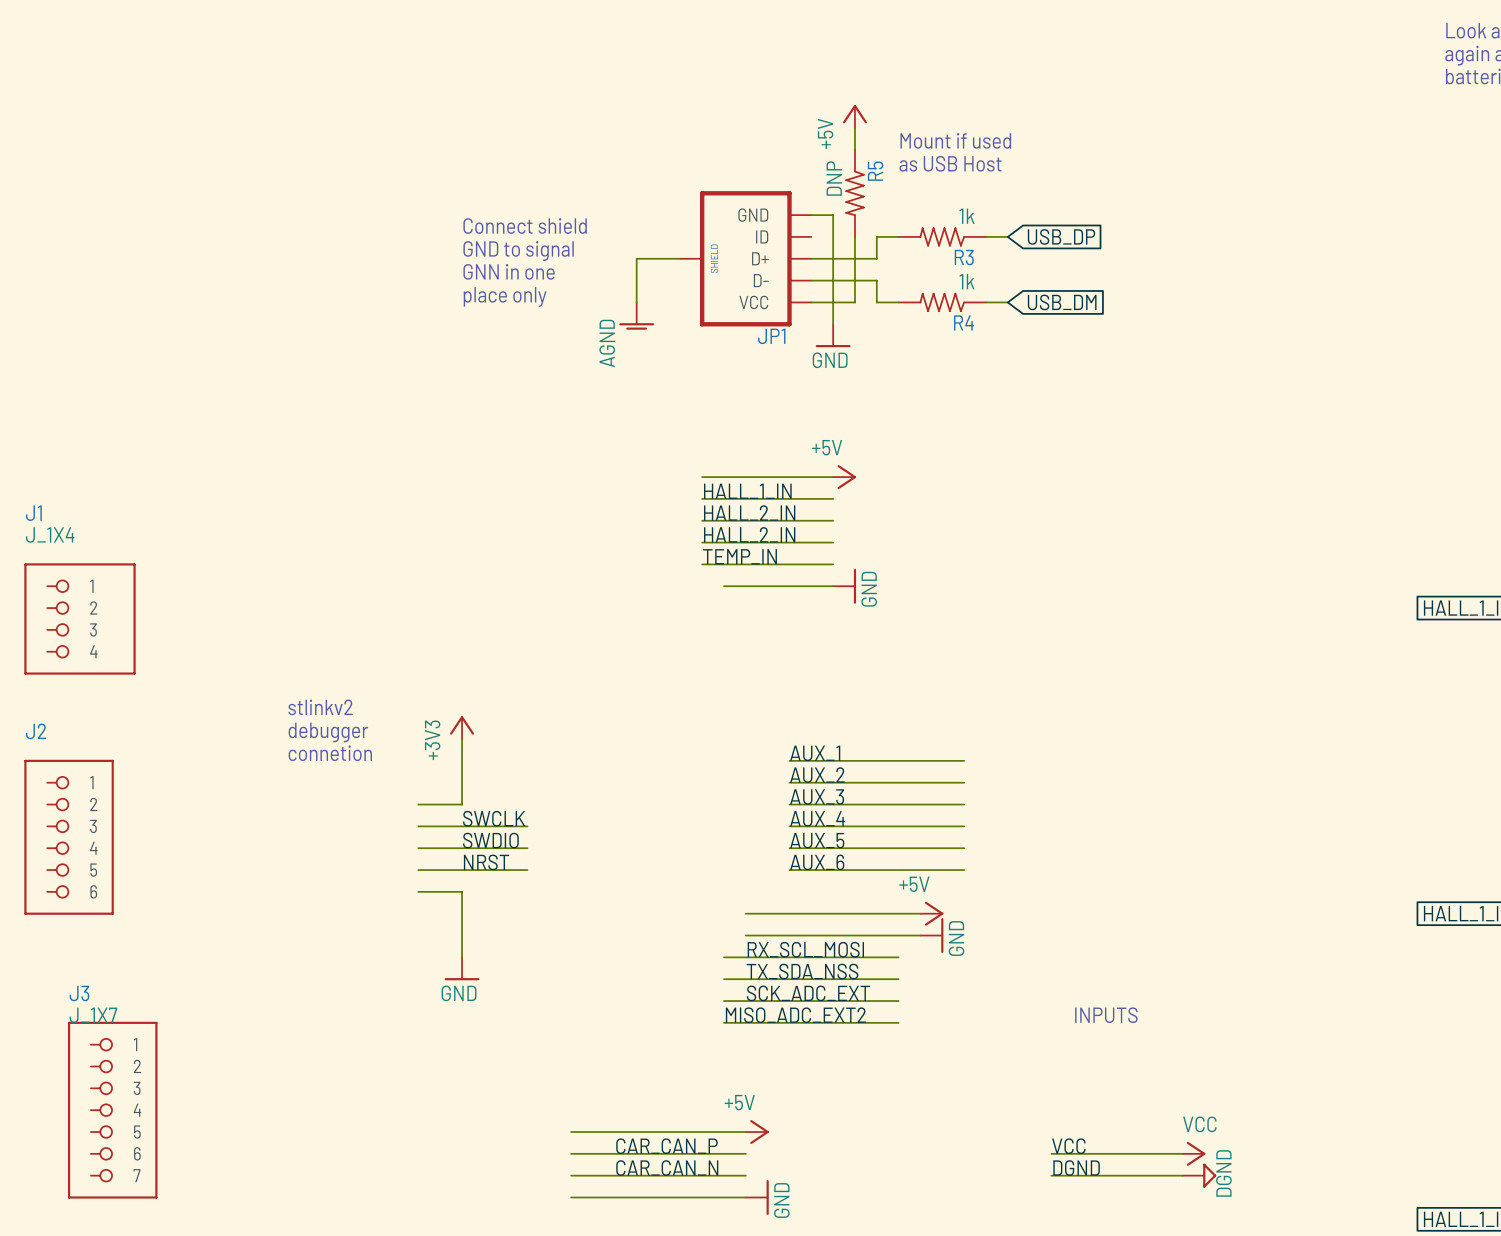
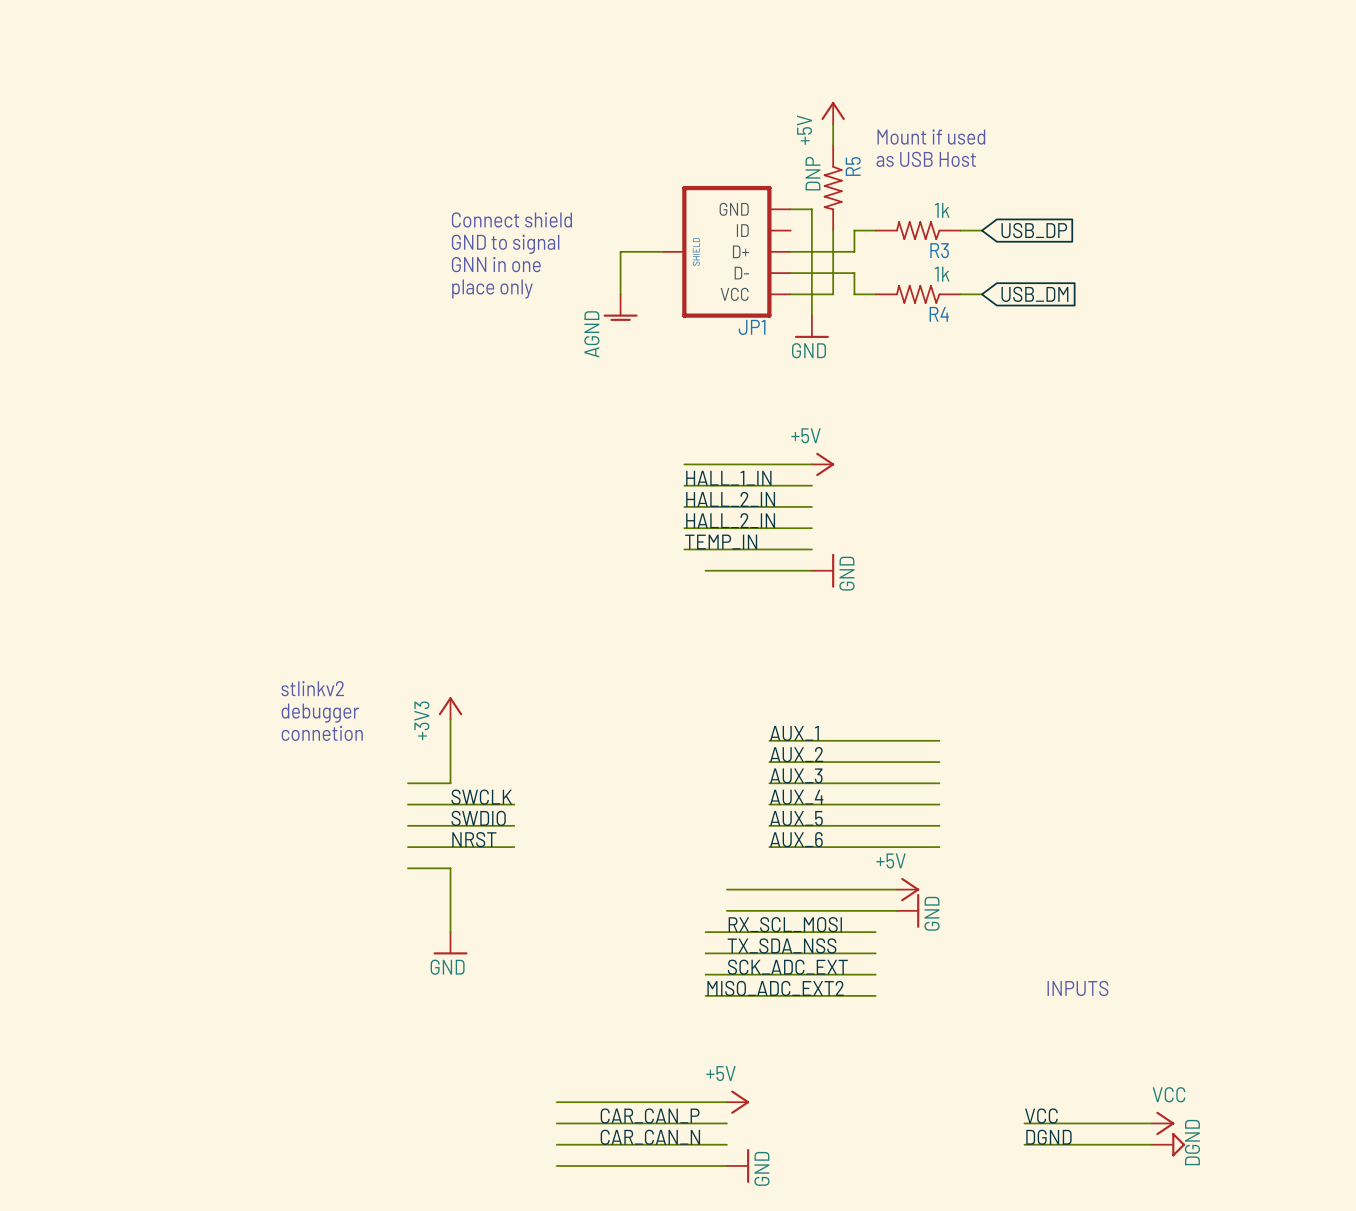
J1: J_1X4 (79, 618) -> none
J2: (69, 837) -> none
J3: J_1X7 (112, 1110) -> none

